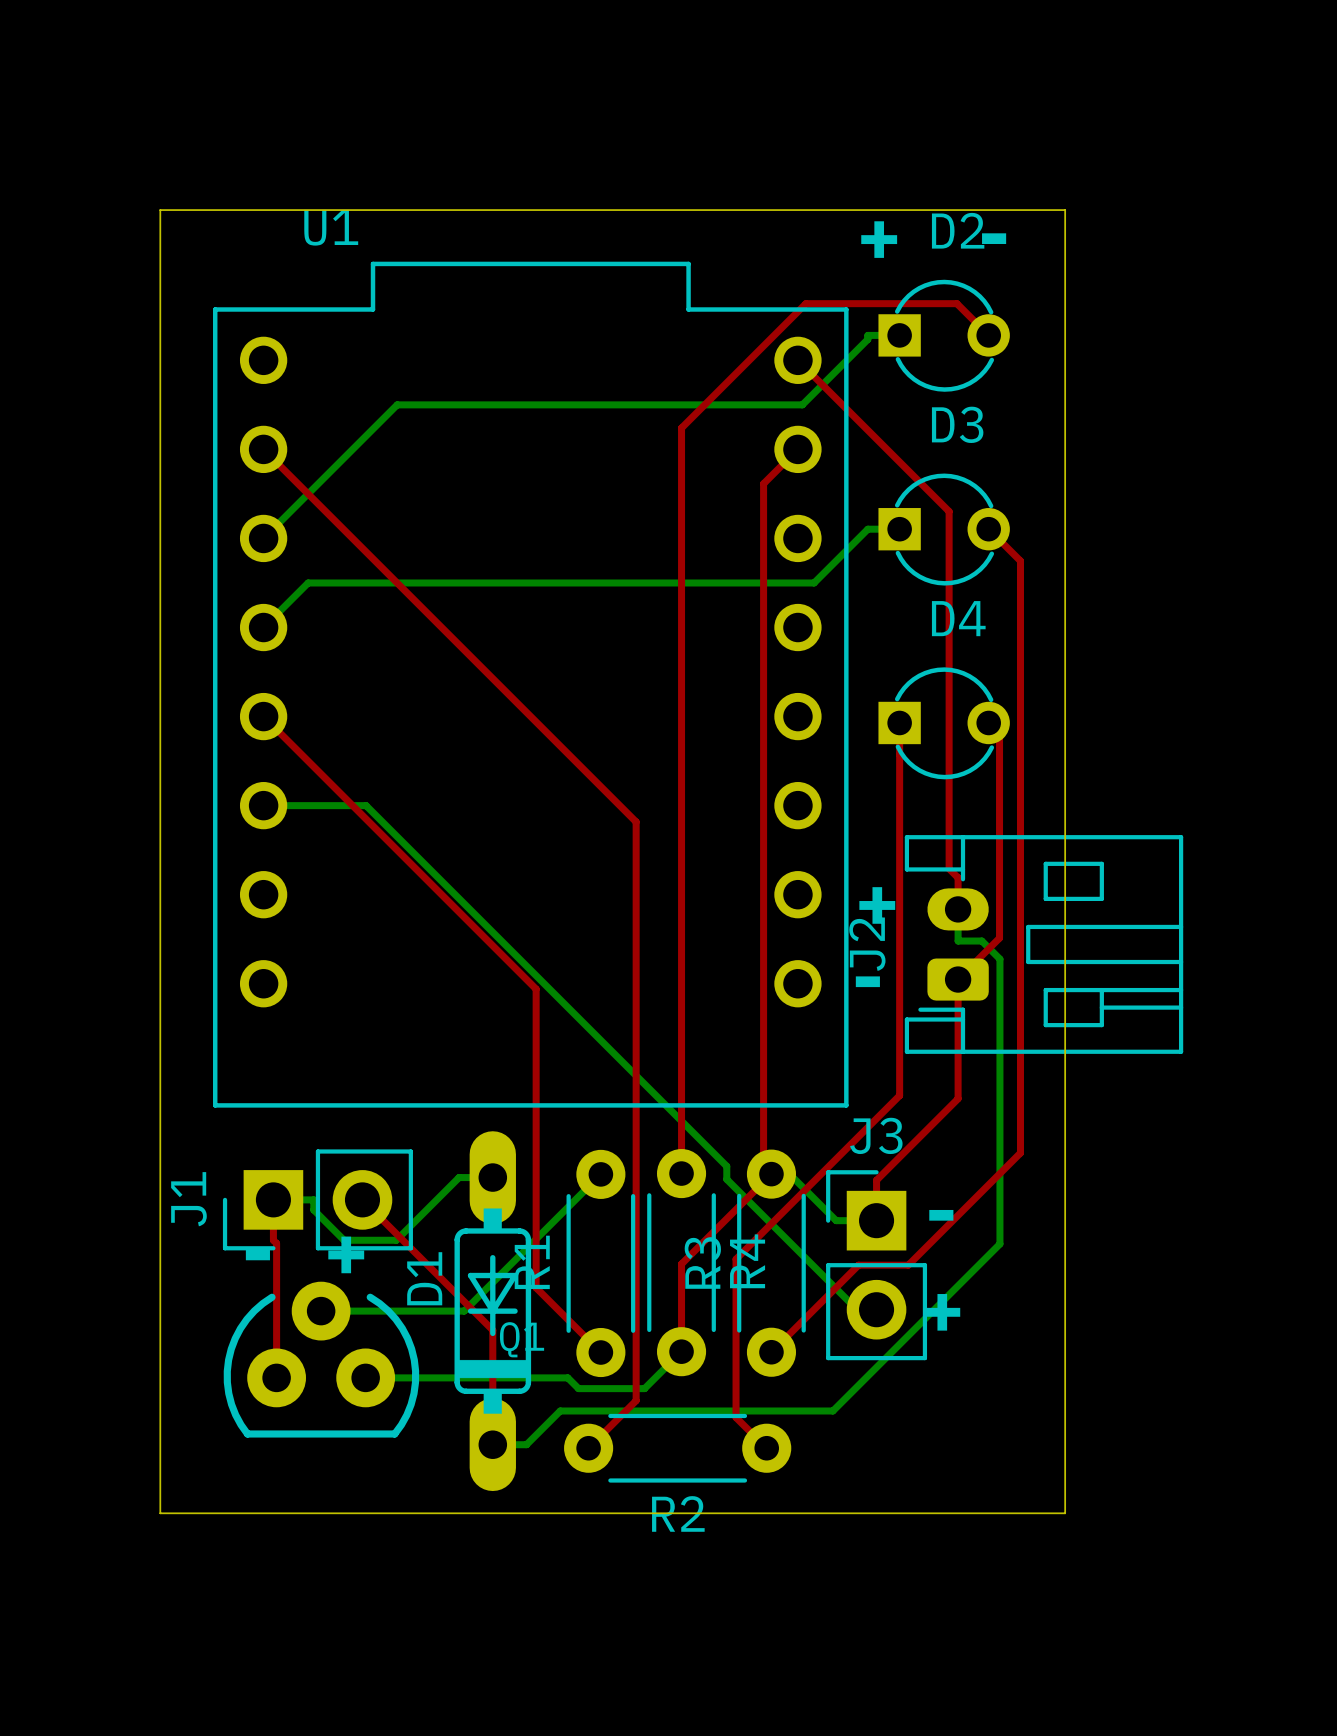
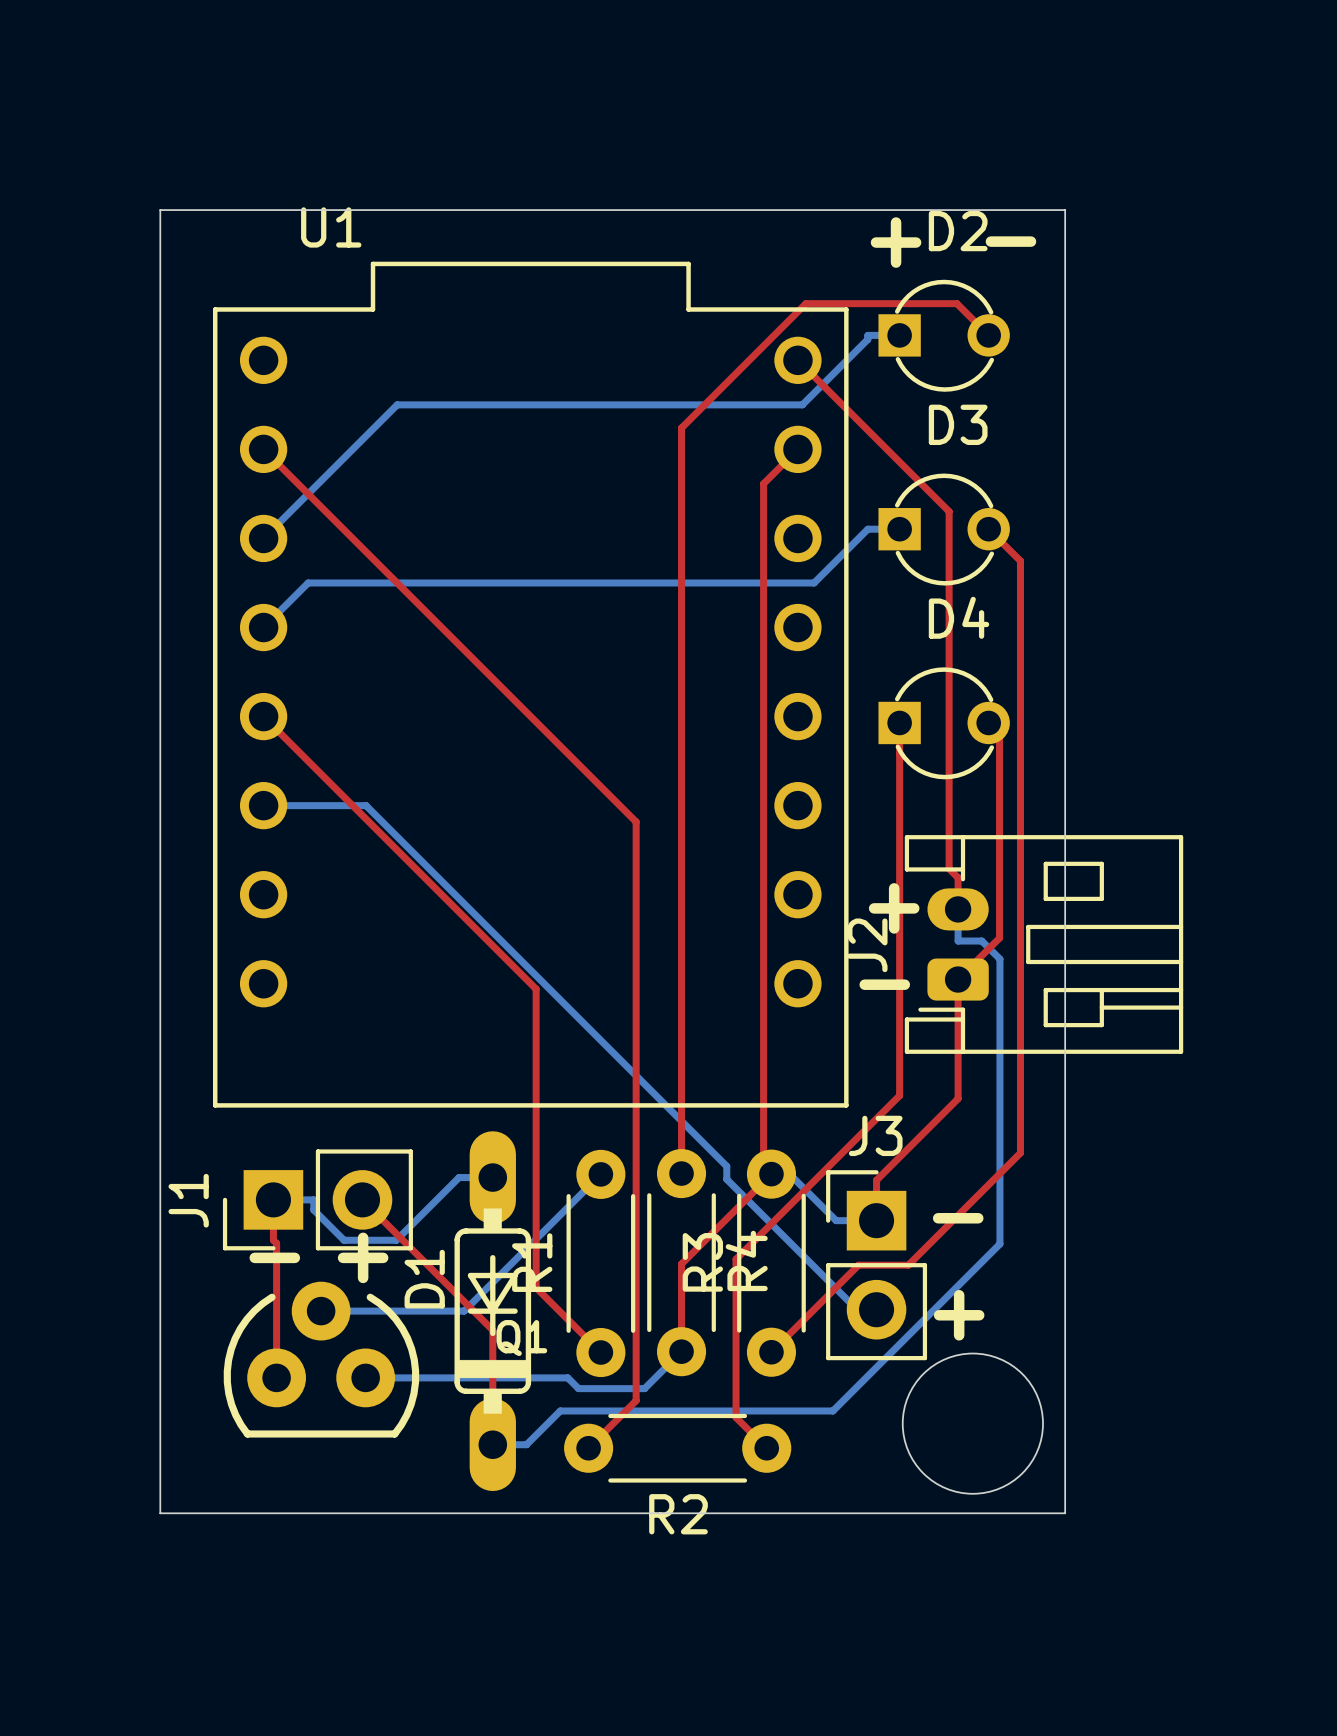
round board edge: none -> [901, 1352, 1044, 1495]

